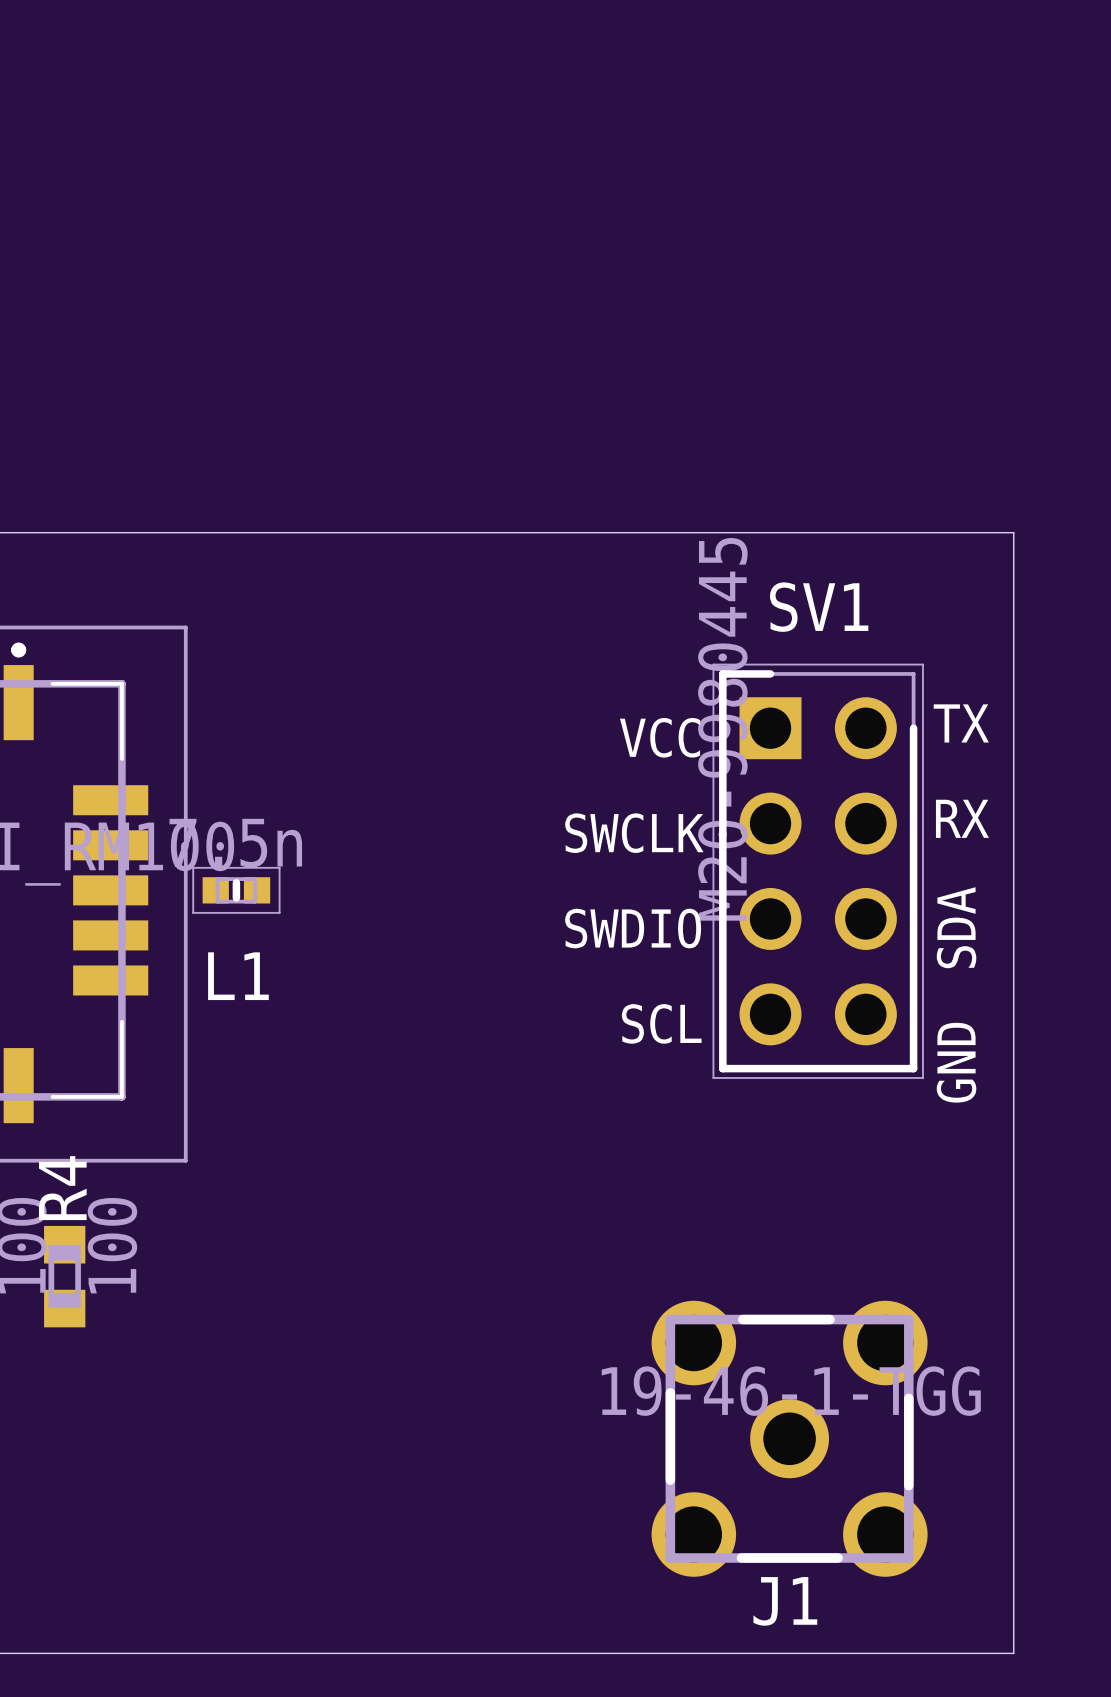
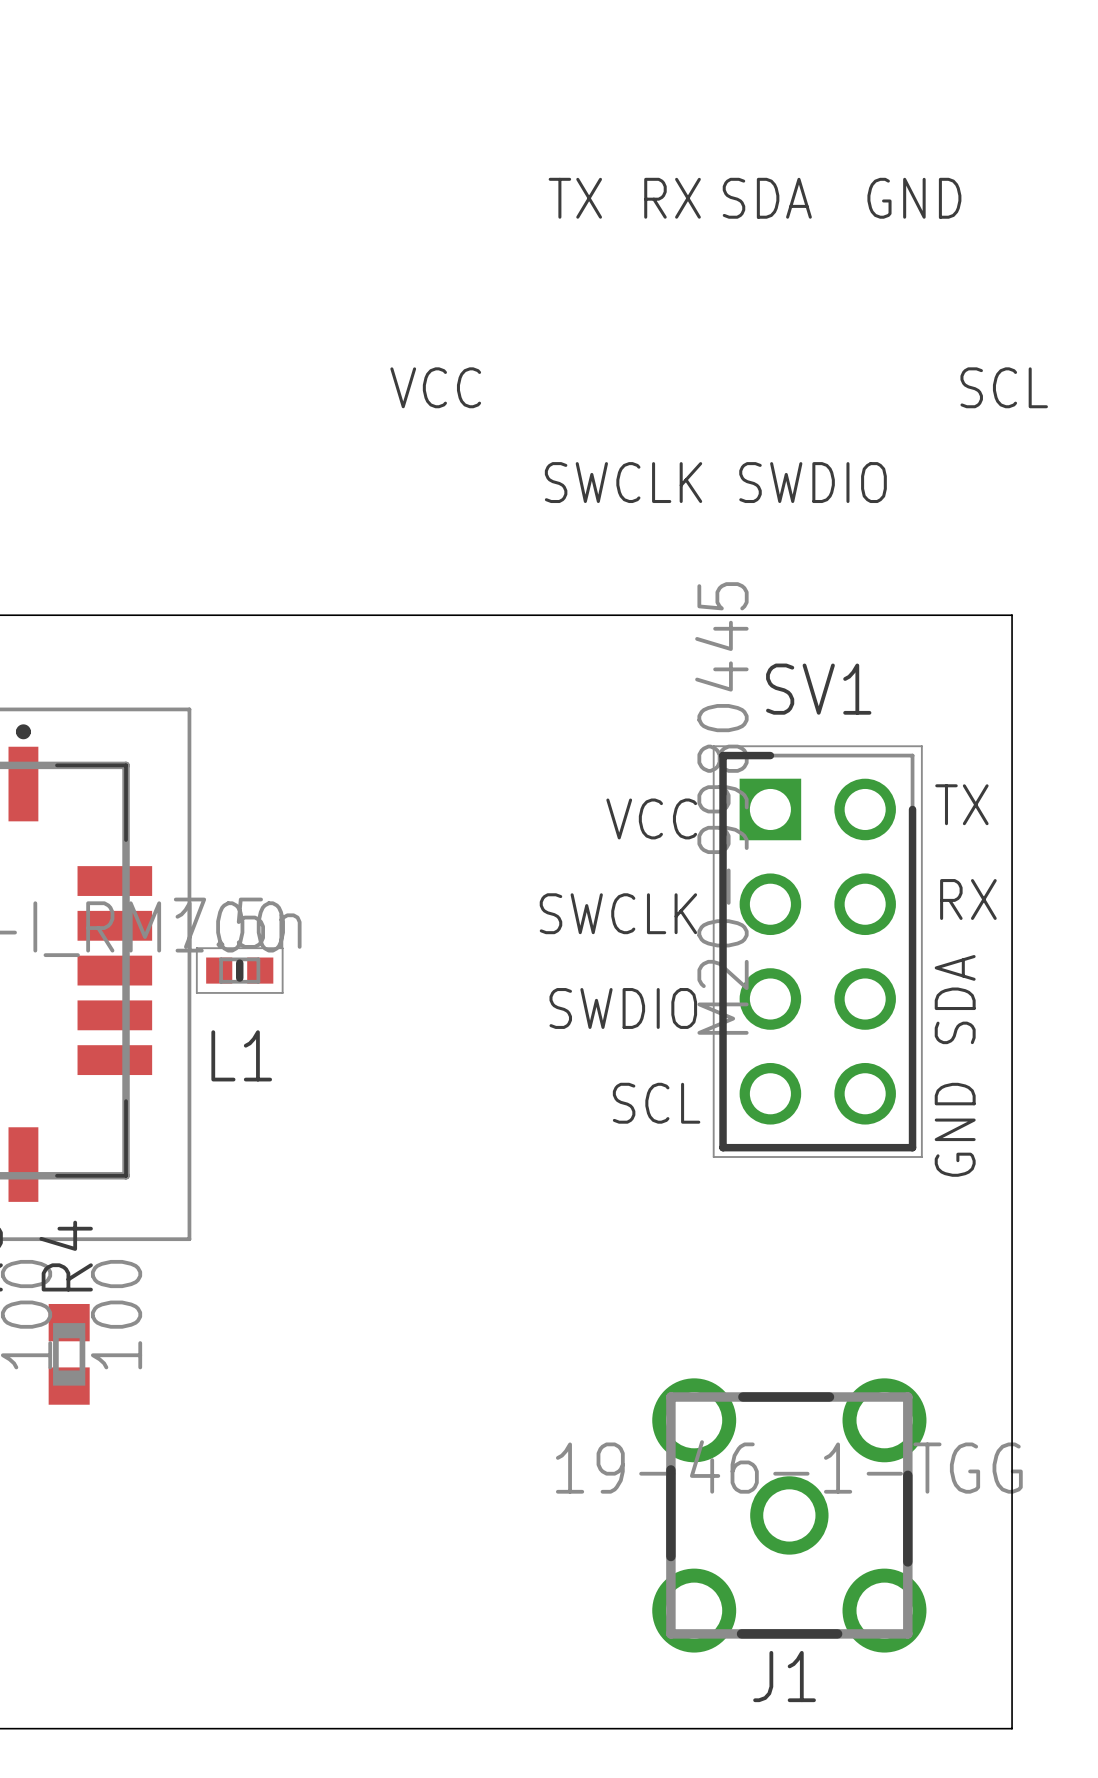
text: none -> TX (575, 198)
text: none -> RX (672, 198)
text: none -> SDA (767, 198)
text: none -> GND (914, 198)
text: none -> VCC (435, 387)
text: none -> SCL (1004, 387)
text: none -> SWCLK (623, 482)
text: none -> SWDIO (813, 482)

